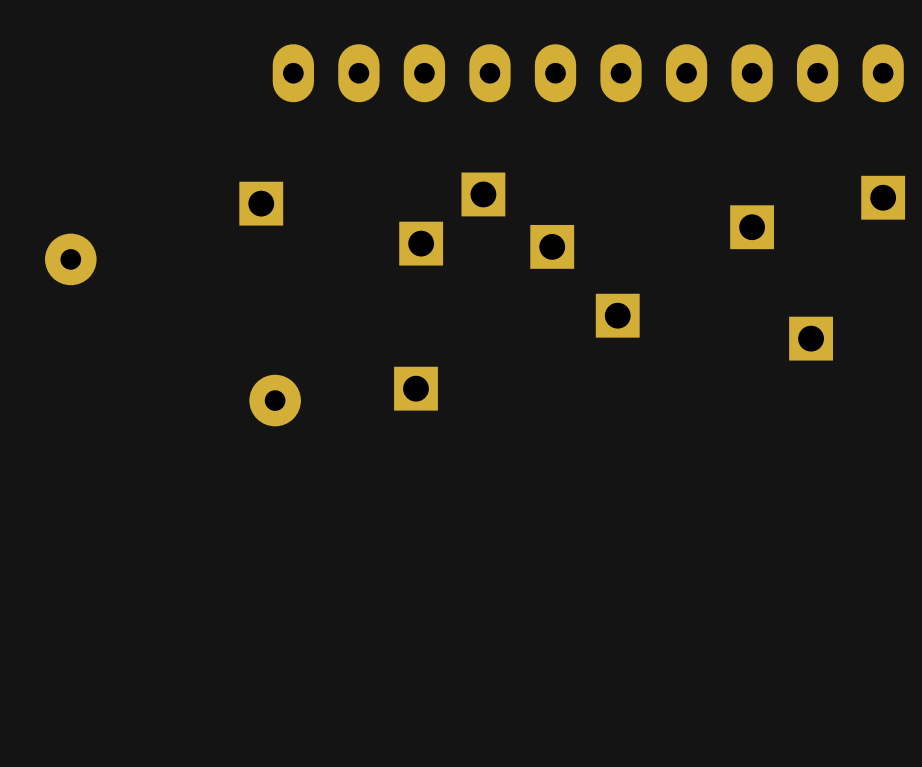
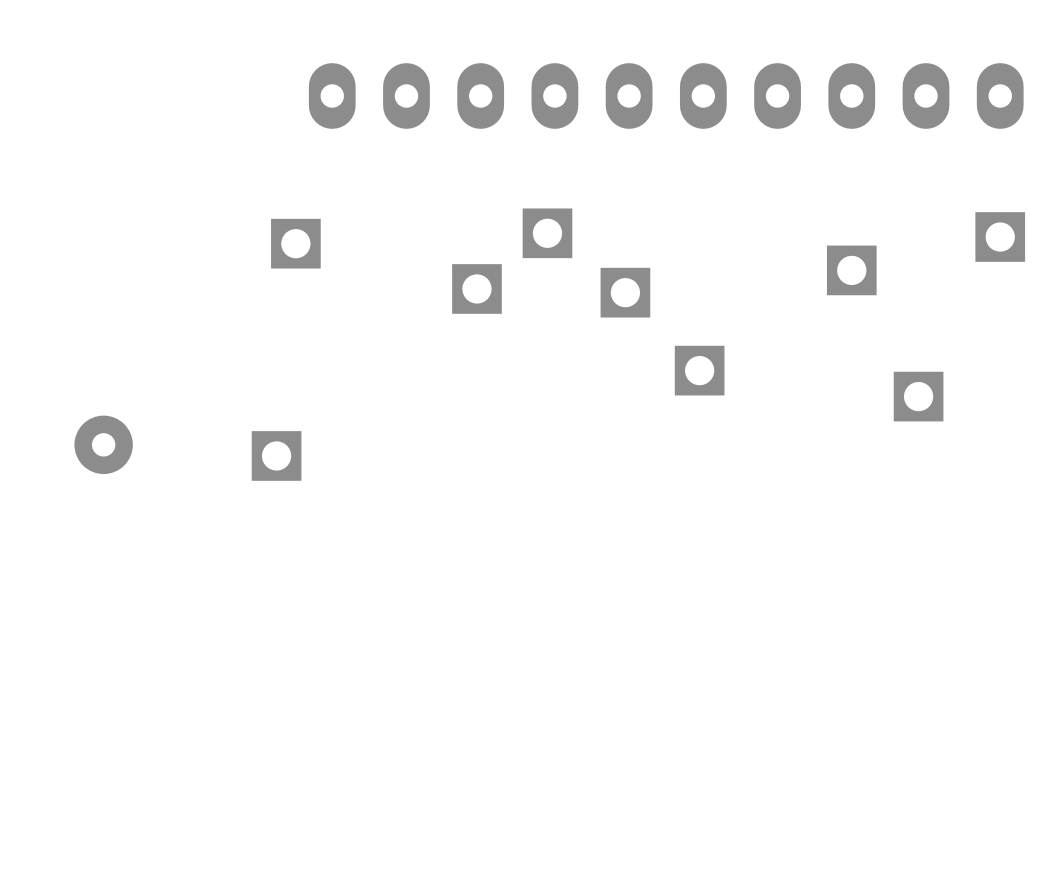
part: (70, 259) -> none
part: none -> (103, 444)
part position: (415, 388) -> (276, 455)
part: (275, 400) -> none

